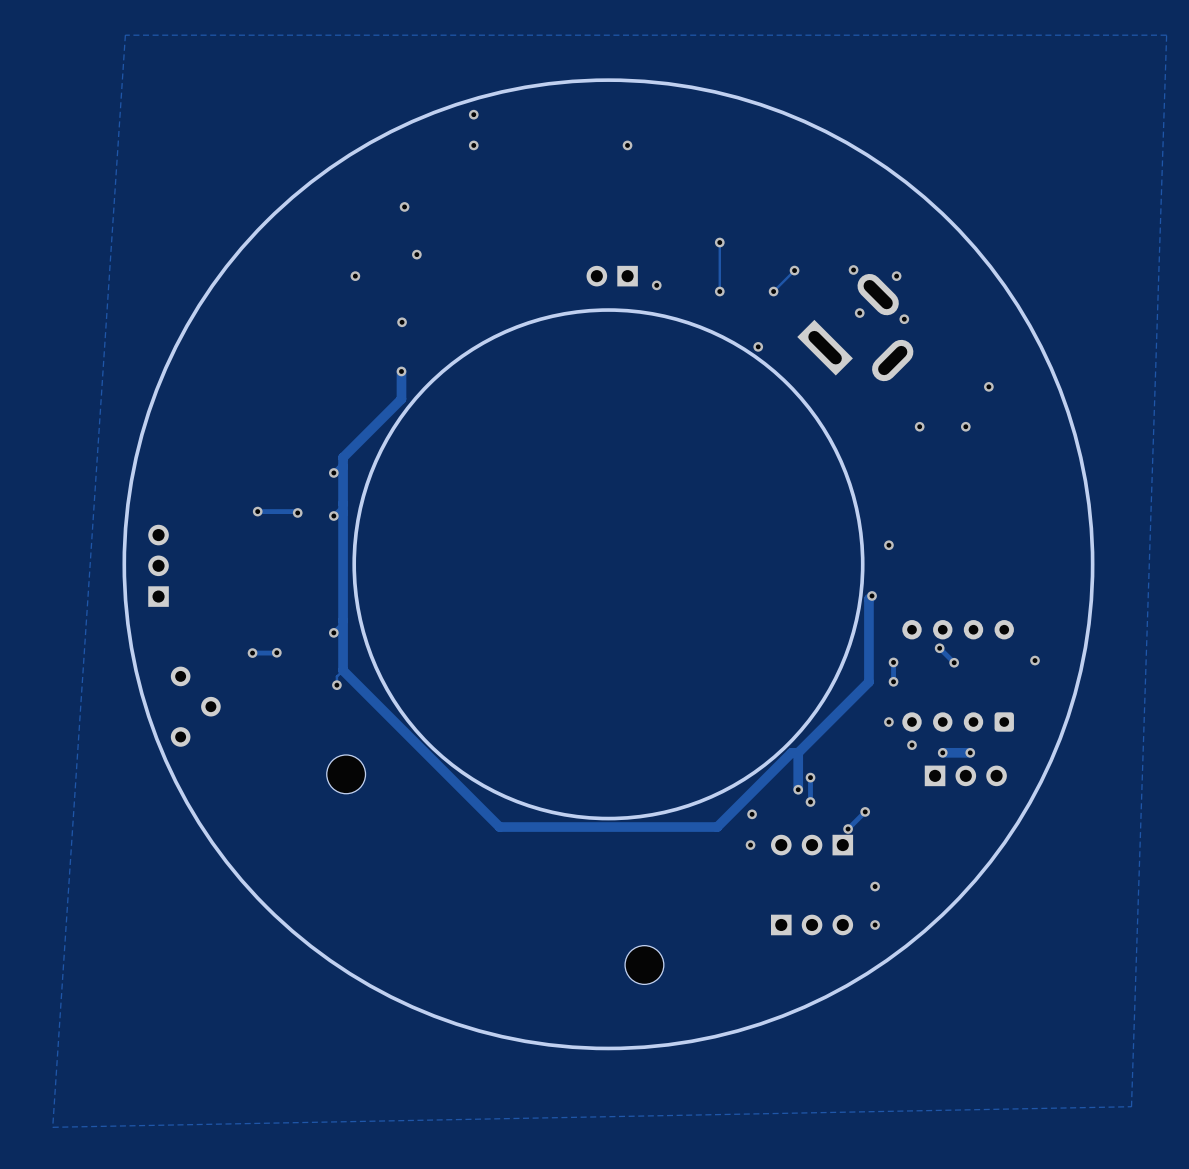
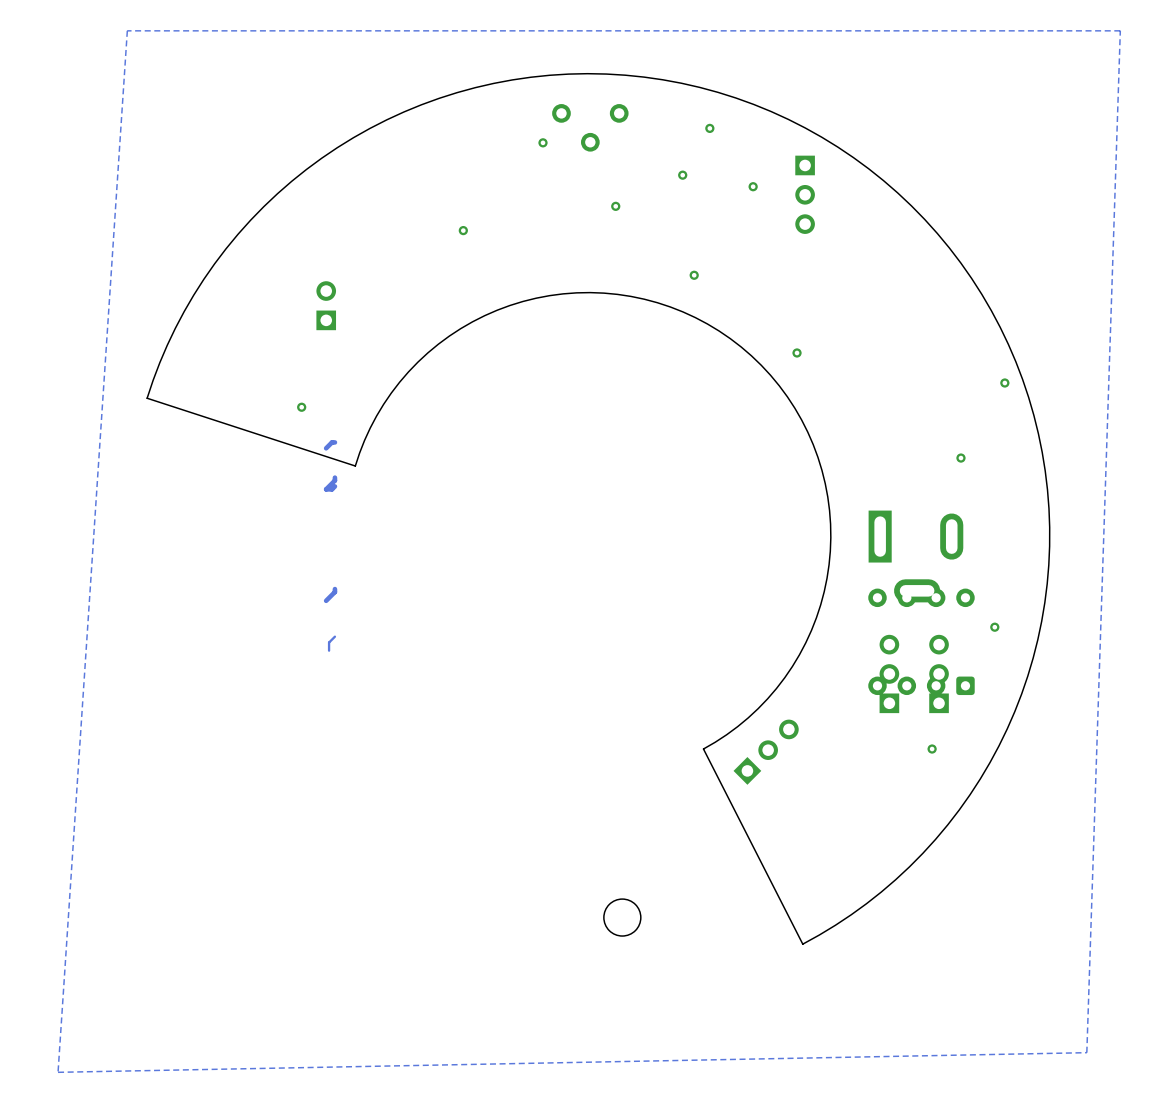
round board edge: [122, 78, 1095, 1051] -> none
via: (473, 114) -> none
part: none -> (590, 127)
via: none -> (709, 128)
via: (473, 145) -> none
via: (627, 145) -> none
via: none -> (543, 142)
via: none -> (682, 175)
via: none -> (753, 186)
via: (404, 206) -> none
part: none -> (805, 194)
via: none -> (615, 206)
track: (719, 242) (719, 291) -> none
via: (719, 242) -> none
via: none -> (463, 230)
via: (416, 254) -> none
via: (853, 269) -> none
track: (794, 270) (773, 291) -> none
via: (794, 270) -> none
via: (355, 276) -> none
part rotation: 0° (612, 276) -> 90° clockwise (326, 305)
part position: (612, 276) -> (326, 305)
via: (896, 276) -> none
via: (656, 285) -> none
via: (773, 291) -> none
round board edge: [352, 308, 865, 821] -> none
via: (859, 313) -> none
via: (904, 319) -> none
via: (402, 322) -> none
part: (855, 327) -> none
via: (758, 346) -> none
track: (401, 371) (401, 399) (343, 457) (343, 670) (499, 827) (717, 827) (791, 752) (798, 752) -> none
via: (401, 371) -> none
via: none -> (797, 352)
via: (988, 386) -> none
via: none -> (1004, 383)
board edge: none -> (147, 398) (355, 466) (370, 428) (383, 404) (399, 382) (417, 362) (449, 336) (472, 321) (497, 310) (522, 301) (549, 295) (590, 292) (617, 294) (644, 299) (670, 306) (695, 317) (719, 331) (741, 346) (761, 365) (779, 385) (794, 408) (813, 444) (821, 470) (827, 496) (830, 524) (830, 551) (827, 578) (816, 617) (805, 642) (792, 666) (776, 688) (758, 708) (726, 734) (703, 749) (802, 944) (851, 914) (881, 892) (909, 866) (947, 825) (970, 794) (990, 762) (1007, 728) (1027, 676) (1037, 639) (1047, 583) (1049, 546) (1048, 508) (1045, 470) (1033, 415) (1015, 361) (1000, 327) (981, 294) (960, 263) (937, 233) (897, 192) (868, 168) (821, 137) (788, 119) (735, 98) (699, 87) (662, 79) (625, 75) (568, 74) (512, 79) (475, 87) (439, 98) (386, 119) (337, 147) (306, 169) (277, 193) (238, 234) (203, 279) (184, 311) (167, 345) (147, 398)
via: (919, 426) -> none
via: (965, 426) -> none
via: none -> (301, 407)
via: (333, 472) -> none
via: none -> (960, 458)
track: (257, 511) (297, 512) -> none
via: (257, 511) -> none
via: (297, 512) -> none
via: (333, 516) -> none
via: (888, 545) -> none
part: (158, 565) -> none
part: none -> (915, 556)
track: (872, 595) (868, 599) (868, 682) (798, 752) -> none
via: (872, 595) -> none
via: (333, 632) -> none
track: (939, 648) (954, 662) -> none
via: (939, 648) -> none
track: (276, 652) (252, 653) -> none
via: (276, 652) -> none
via: (252, 653) -> none
track: (893, 662) (893, 681) -> none
via: (893, 662) -> none
via: (954, 662) -> none
via: (893, 681) -> none
via: (336, 685) -> none
part: (195, 706) -> none
part: none -> (889, 673)
part: none -> (939, 673)
via: (888, 722) -> none
via: (911, 745) -> none
track: (798, 752) (798, 789) -> none
via: (942, 752) -> none
track: (970, 752) (942, 752) -> none
via: (970, 752) -> none
part: (346, 774) -> none
part: (965, 775) -> none
track: (810, 777) (810, 802) -> none
via: (810, 777) -> none
via: none -> (932, 749)
via: (798, 789) -> none
part: none -> (766, 752)
via: (810, 802) -> none
track: (865, 811) (848, 829) -> none
via: (865, 811) -> none
via: (752, 814) -> none
via: (848, 829) -> none
via: (750, 845) -> none
part: (812, 845) -> none
via: (875, 886) -> none
part: (812, 924) -> none
via: (875, 924) -> none

